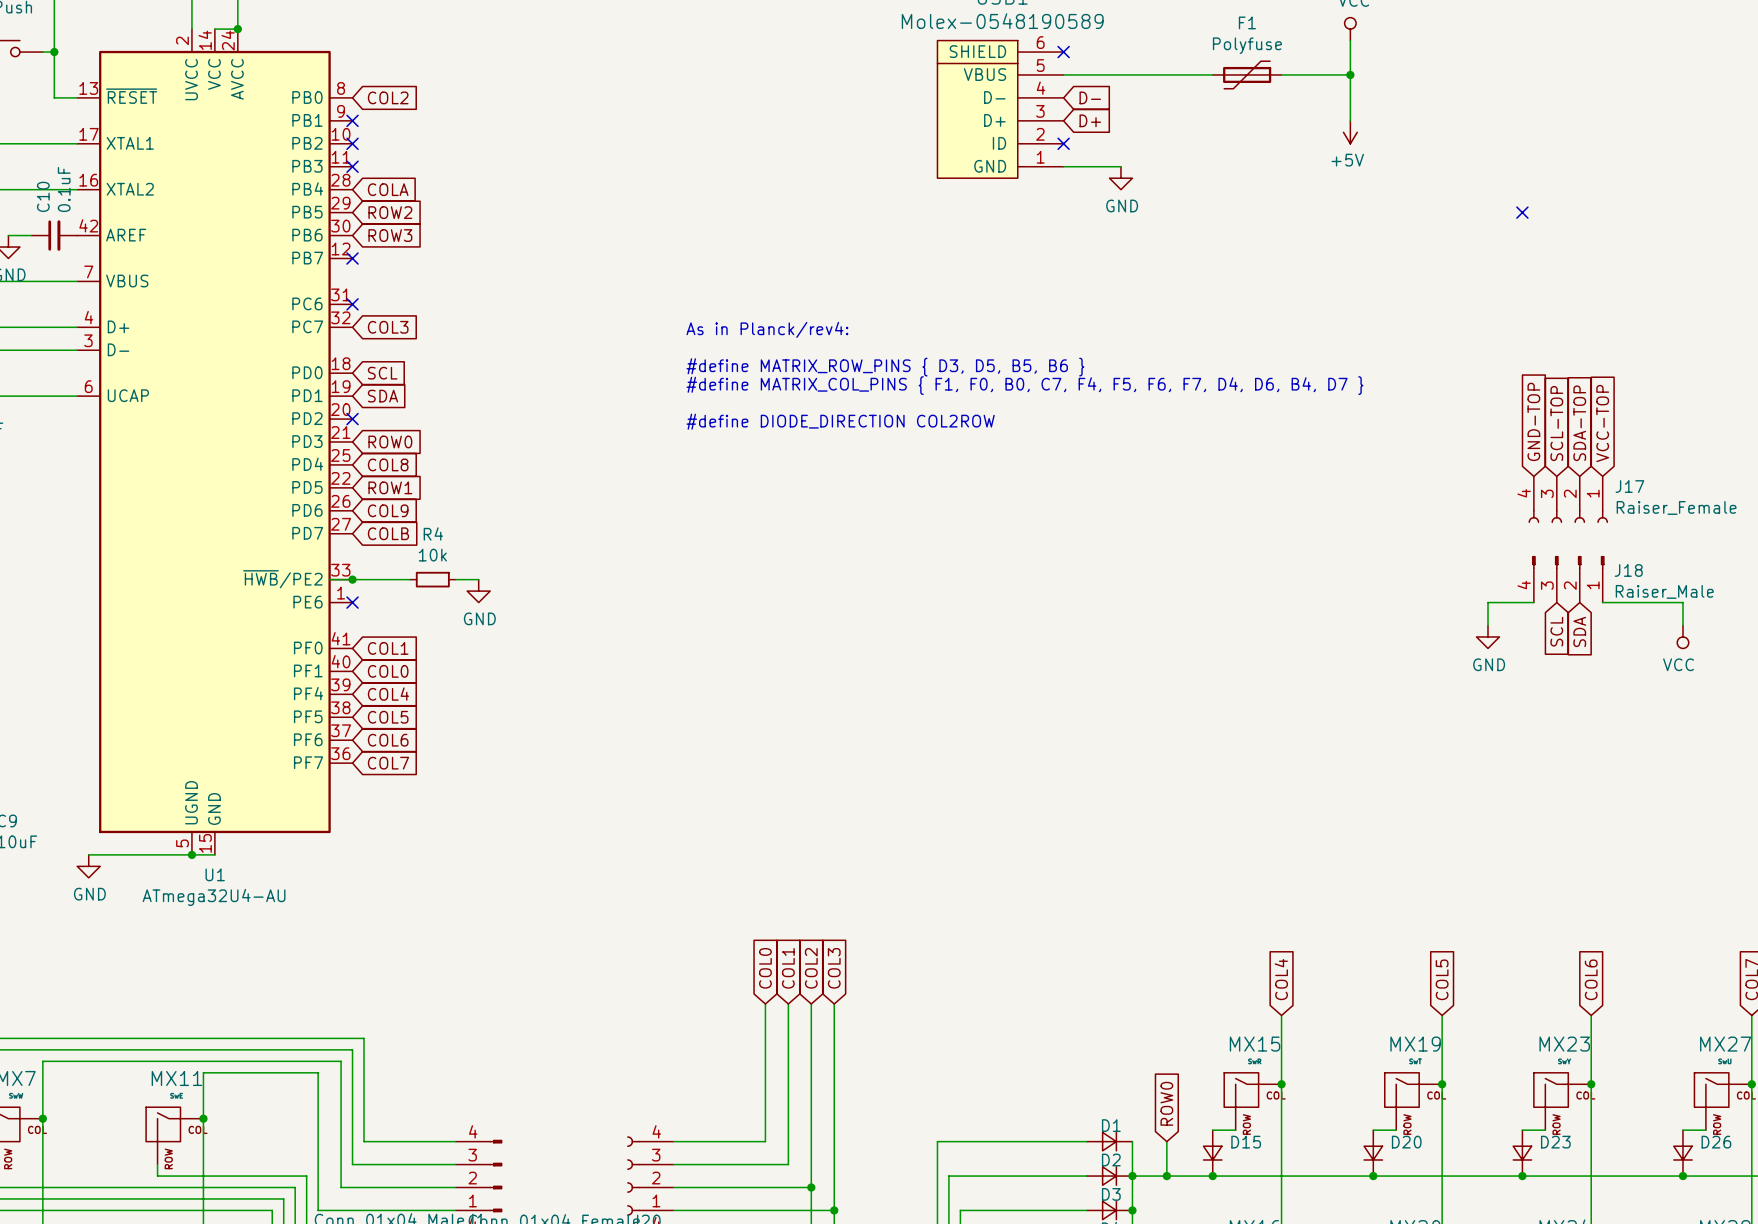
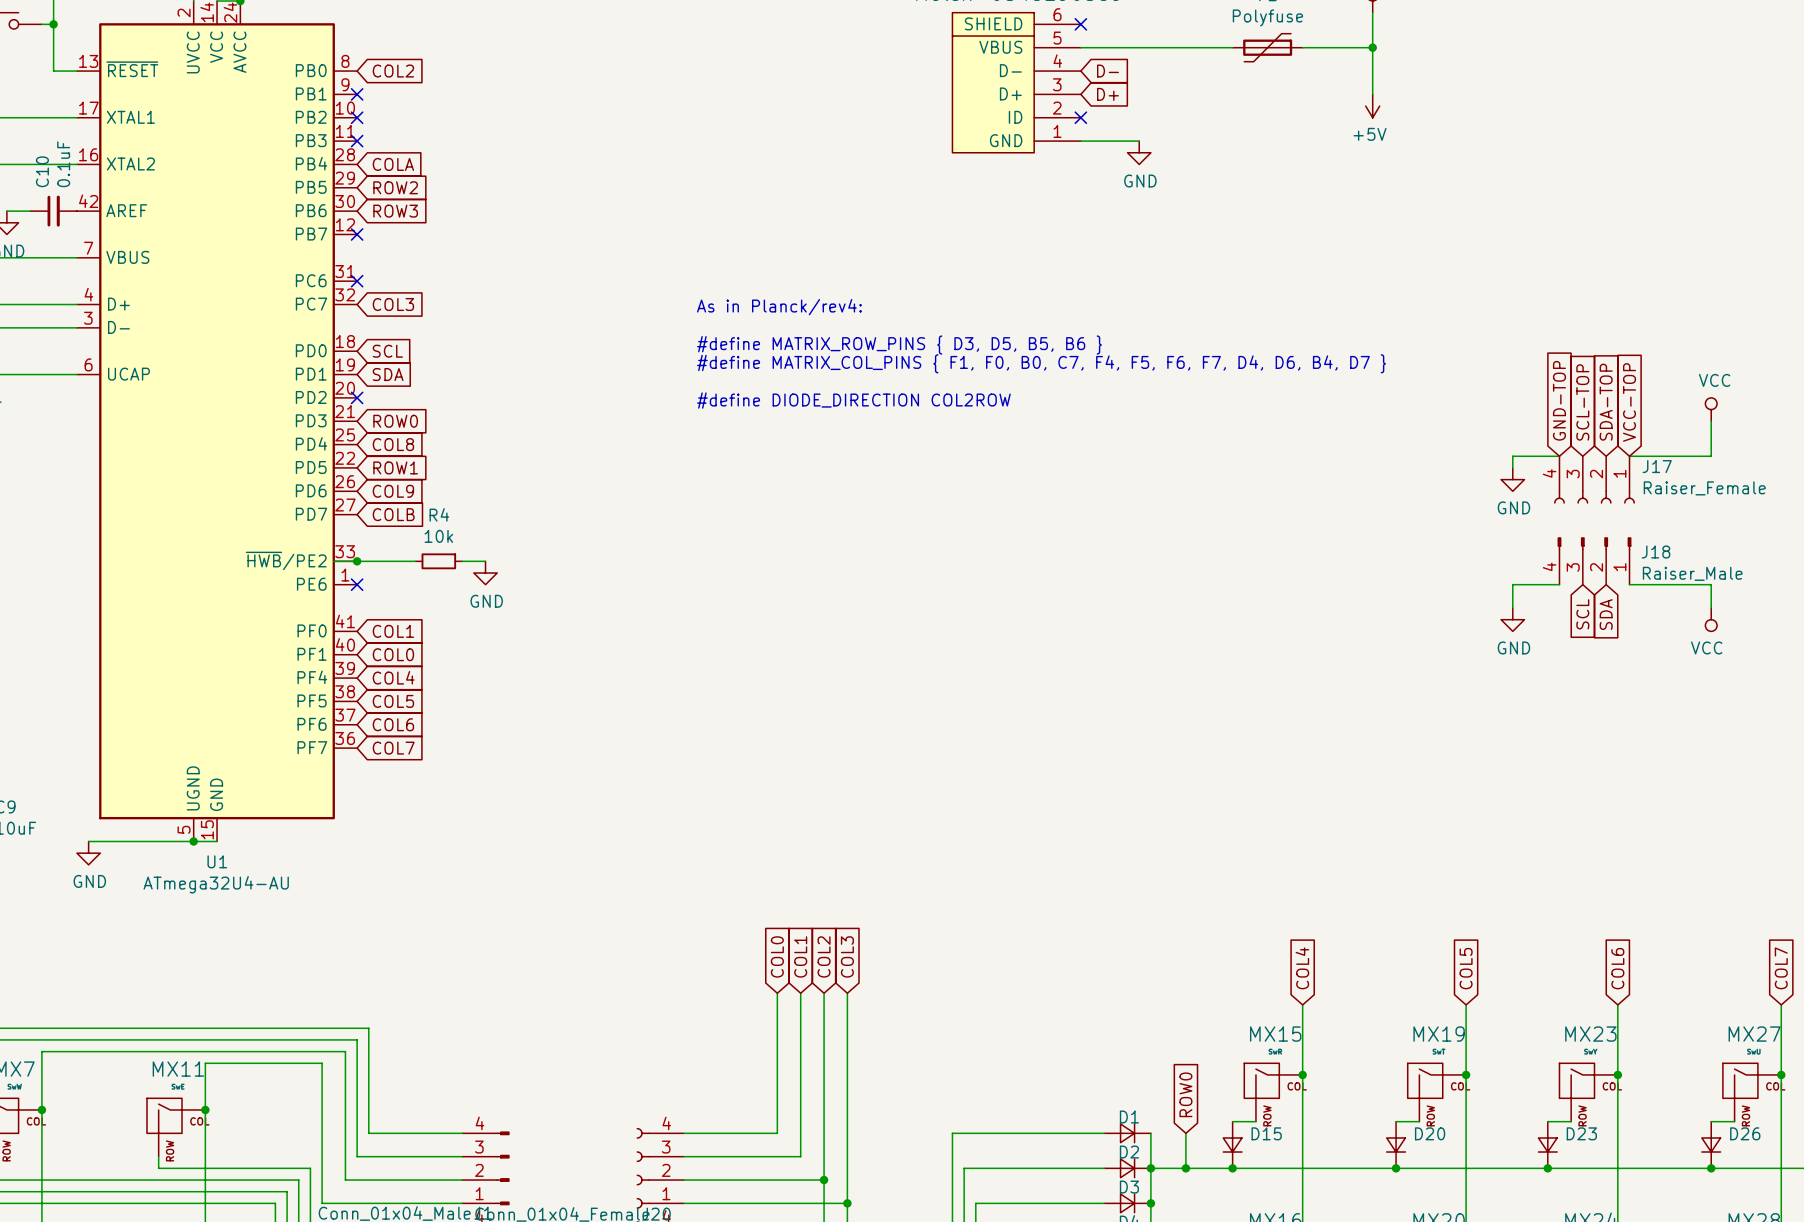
no-connect mark: (1522, 212) -> none
power symbol: none -> VCC (1711, 409)
wire: none -> (1711, 421) (1711, 456) (1629, 456)
wire: none -> (1559, 456) (1512, 456) (1512, 467)
power symbol: none -> GND (1512, 479)

